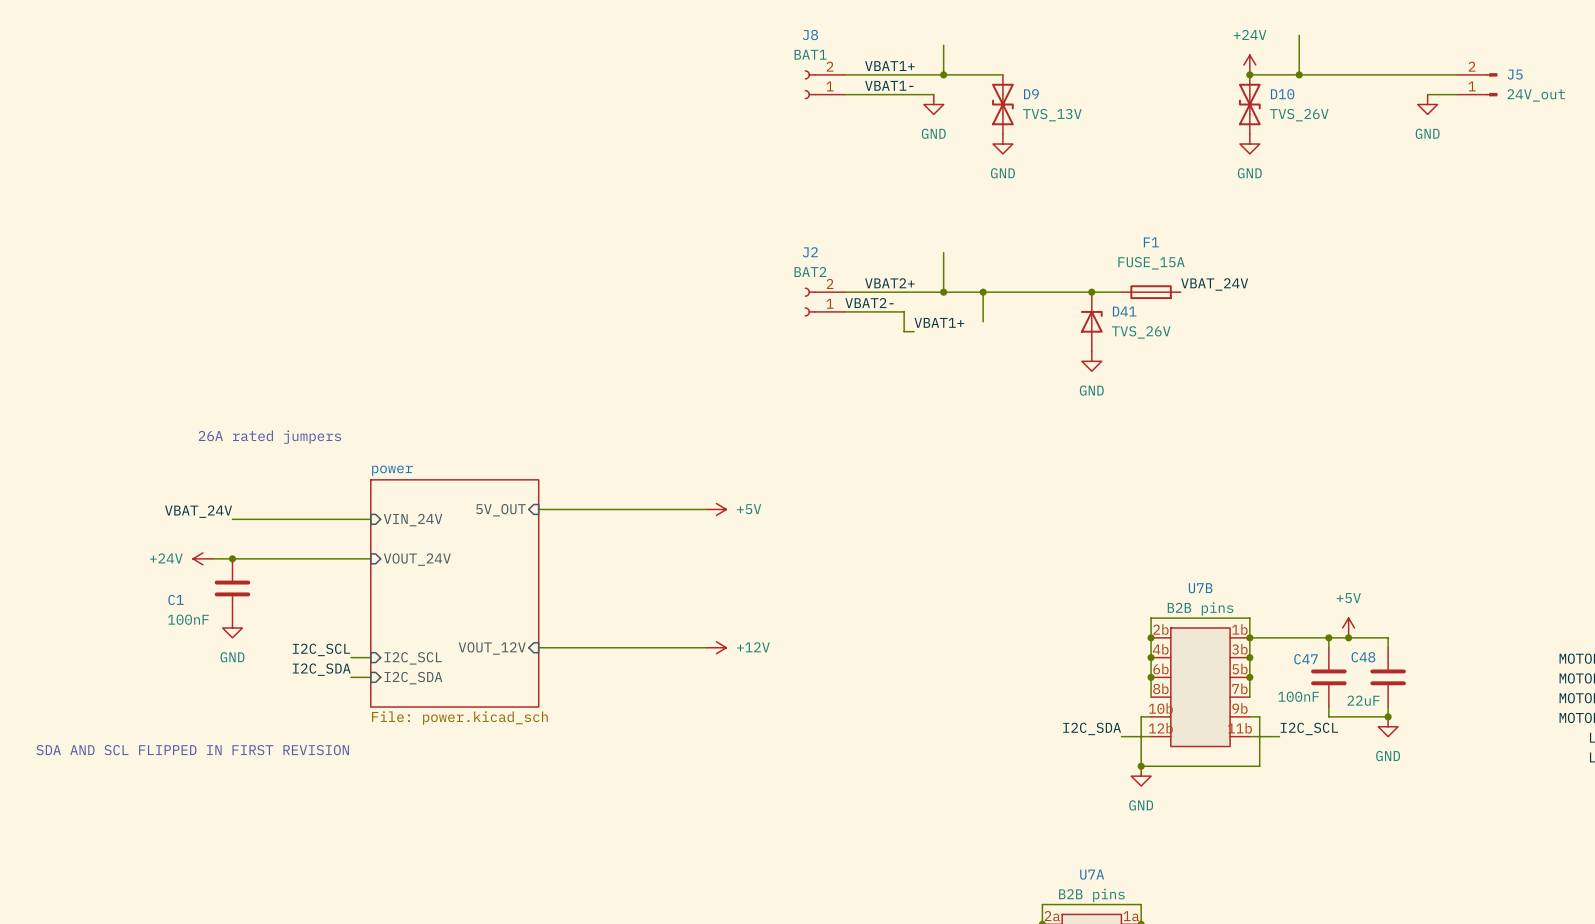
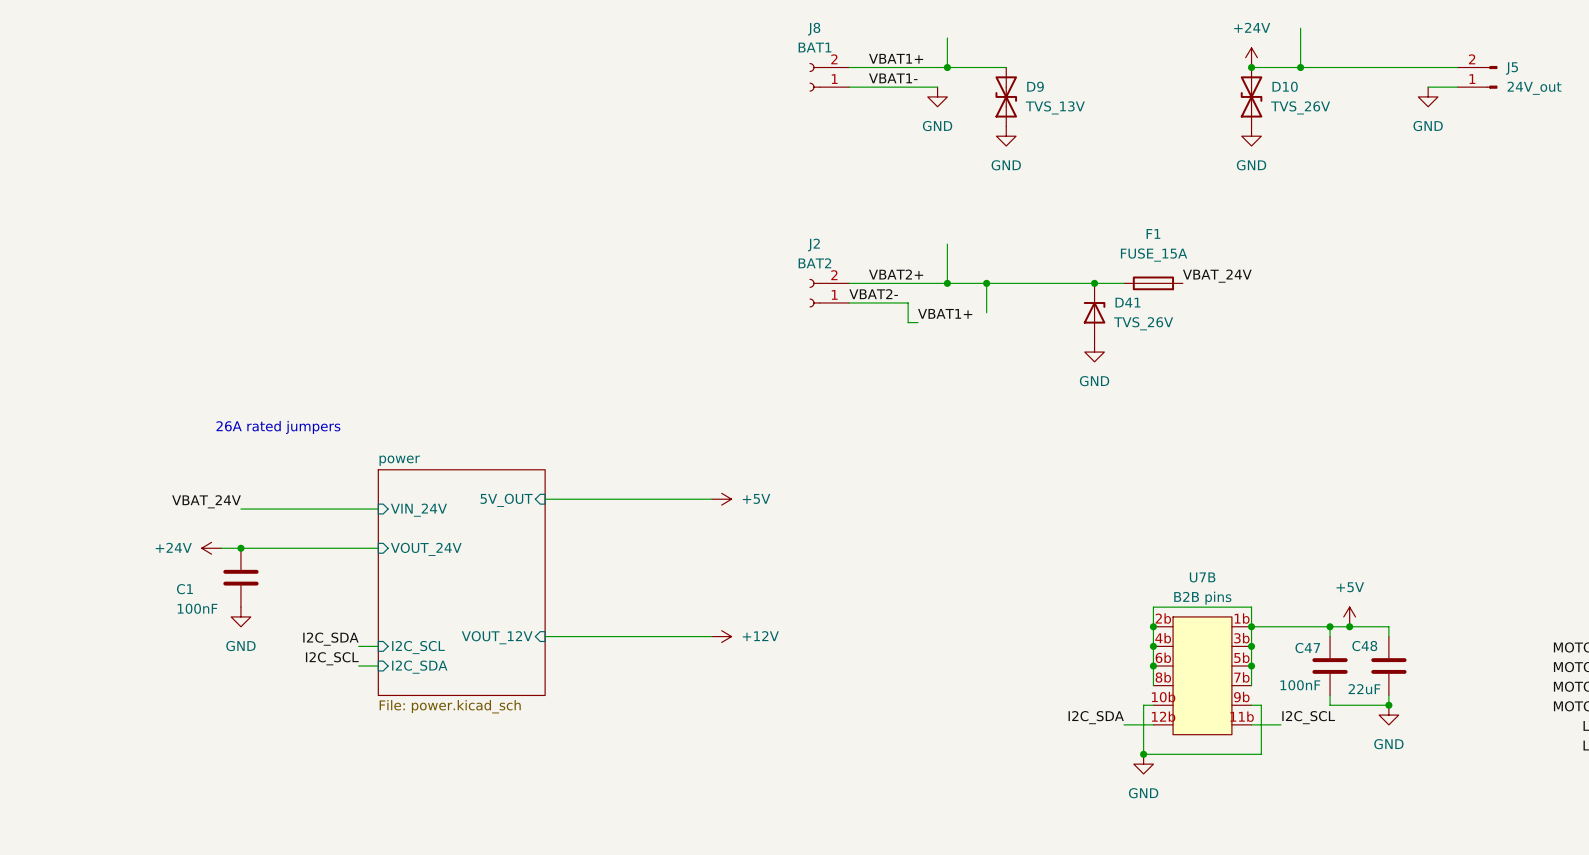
label: I2C_SCL (321, 649) -> I2C_SDA (330, 639)
label: I2C_SDA (321, 669) -> I2C_SCL (332, 658)
text: SDA AND SCL FLIPPED IN FIRST REVISION (192, 750) -> none

